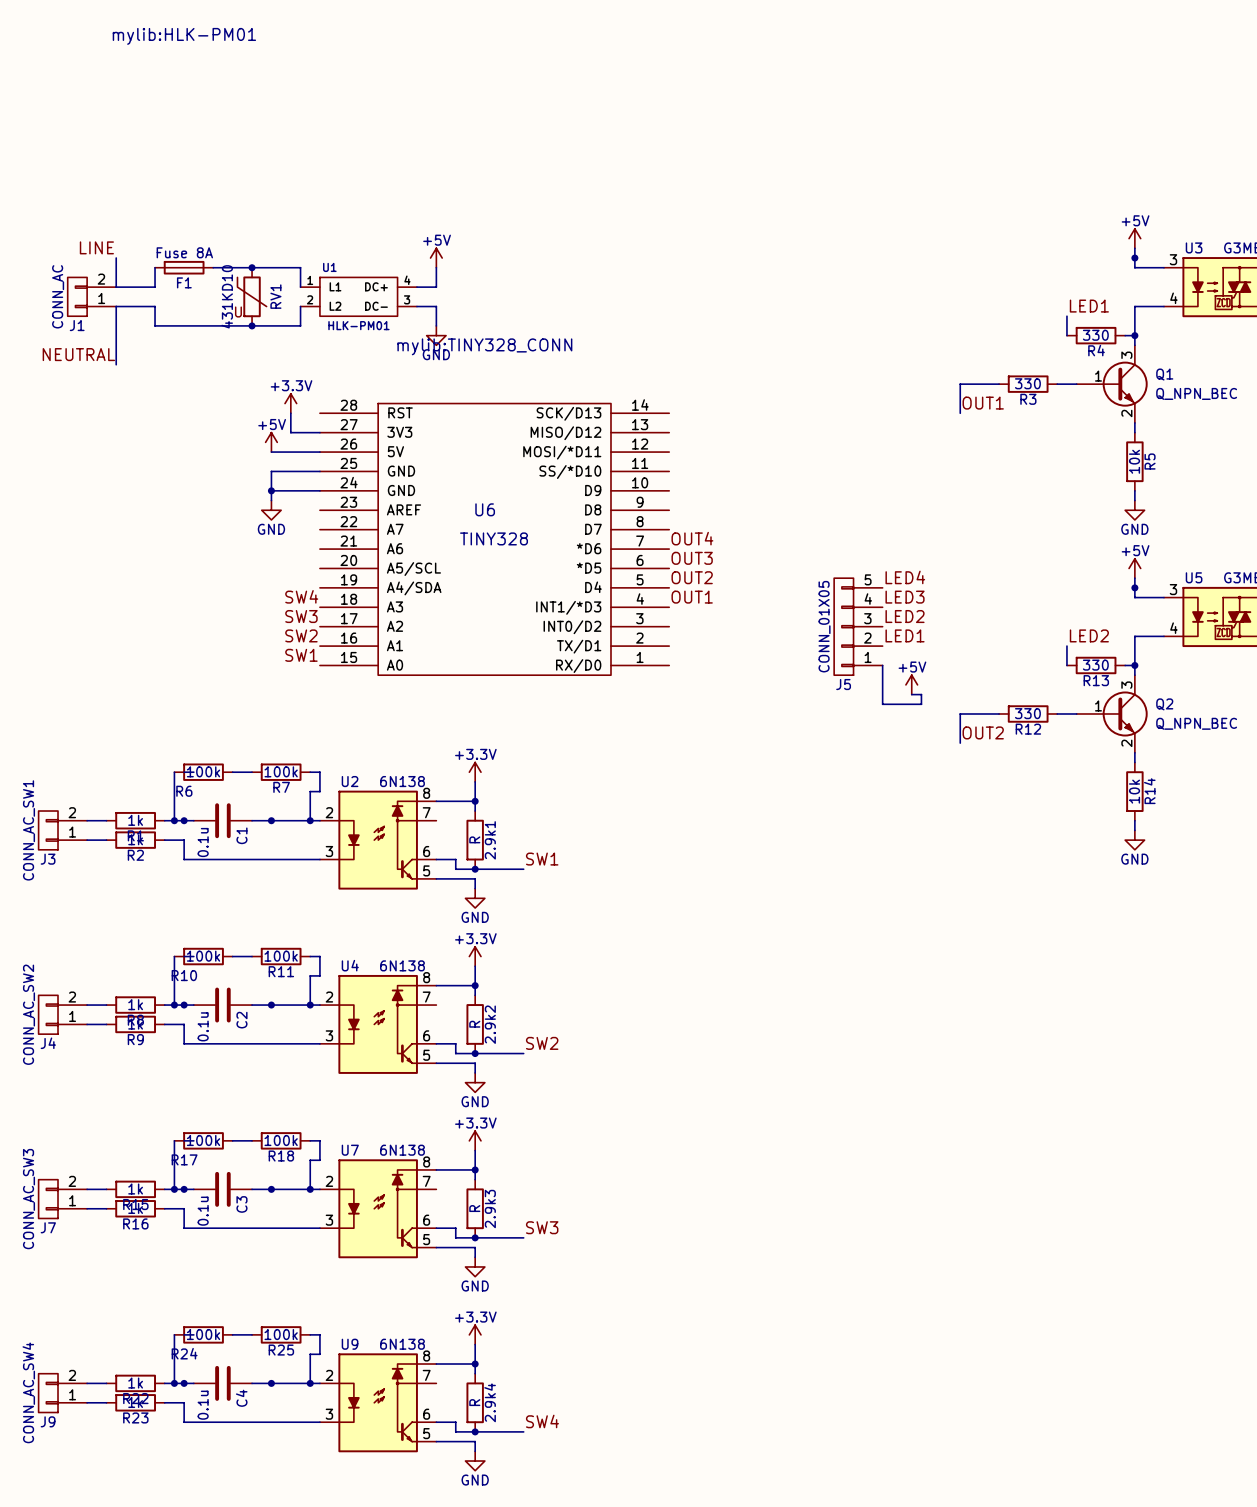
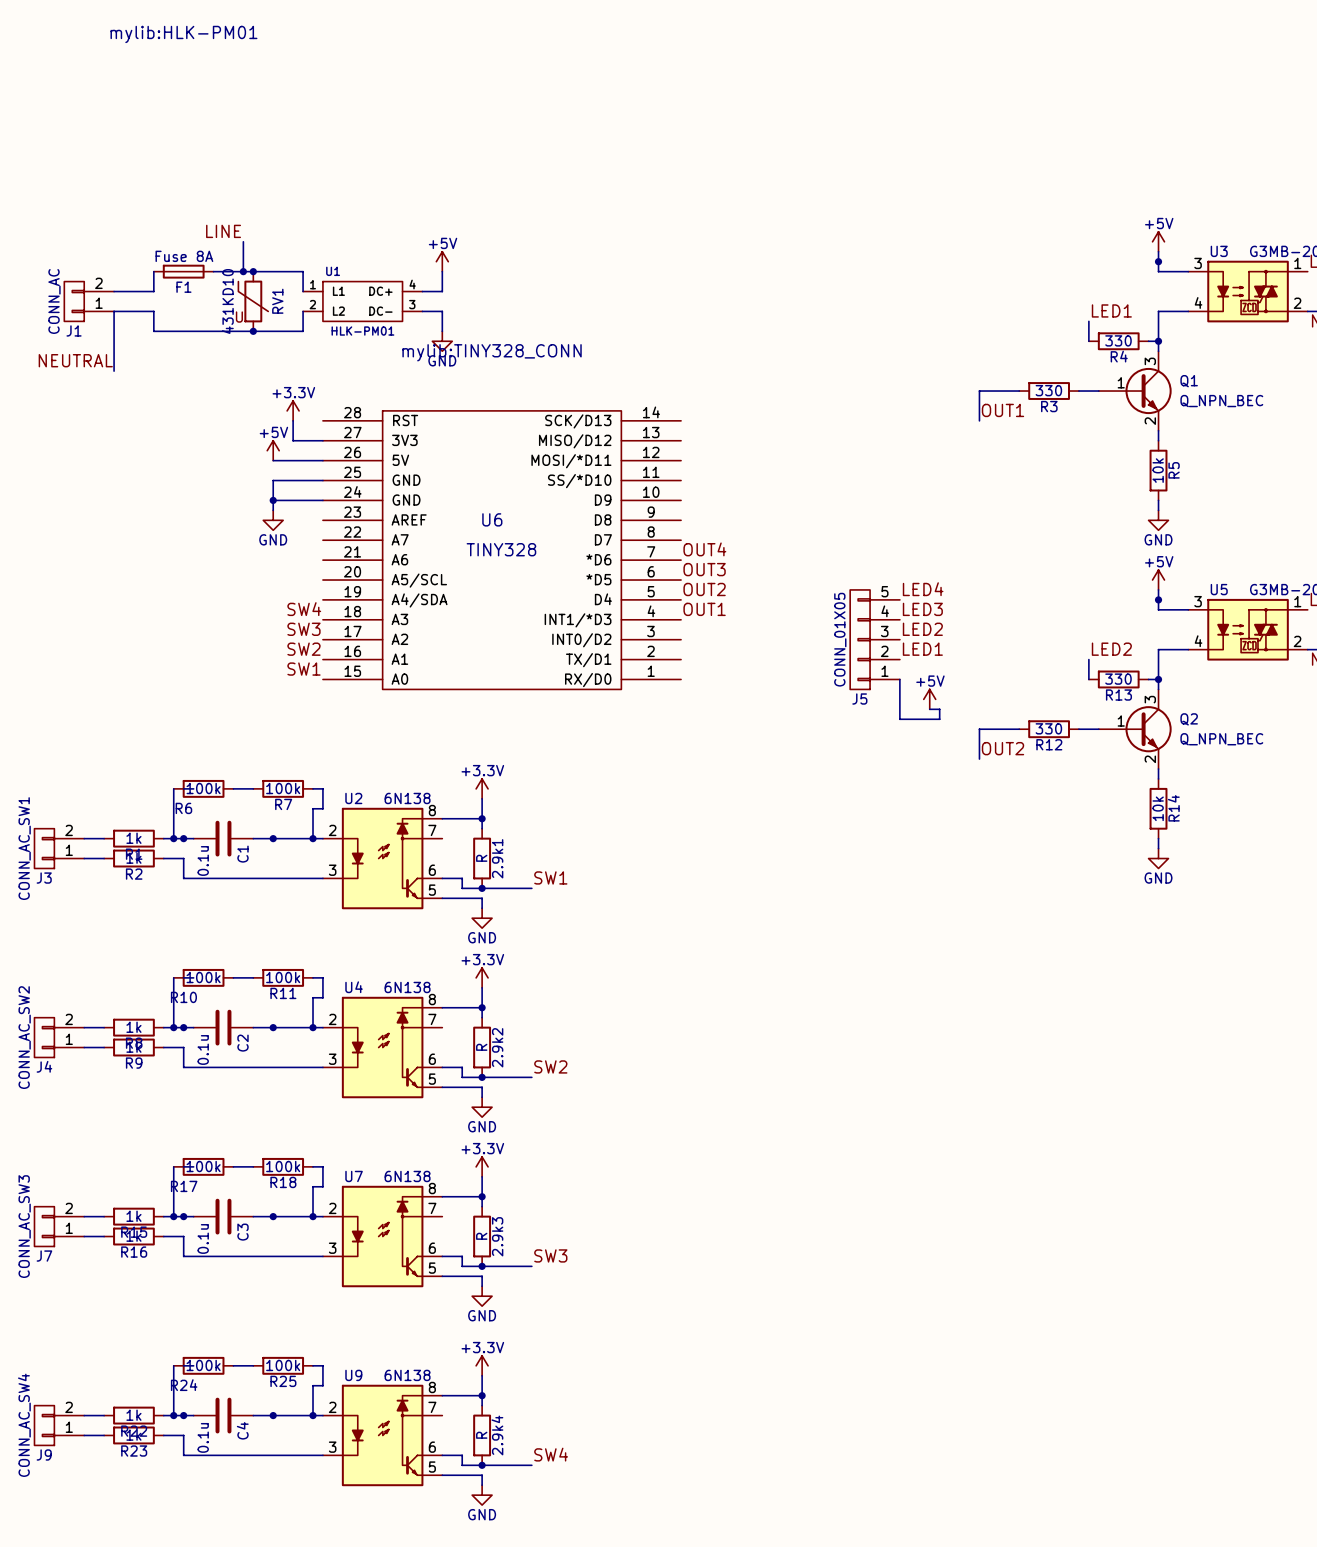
label position: LINE (96, 247) -> LINE (223, 231)
wire: (116, 258) (116, 287) -> (243, 241) (243, 271)
junction: none -> (243, 271)

